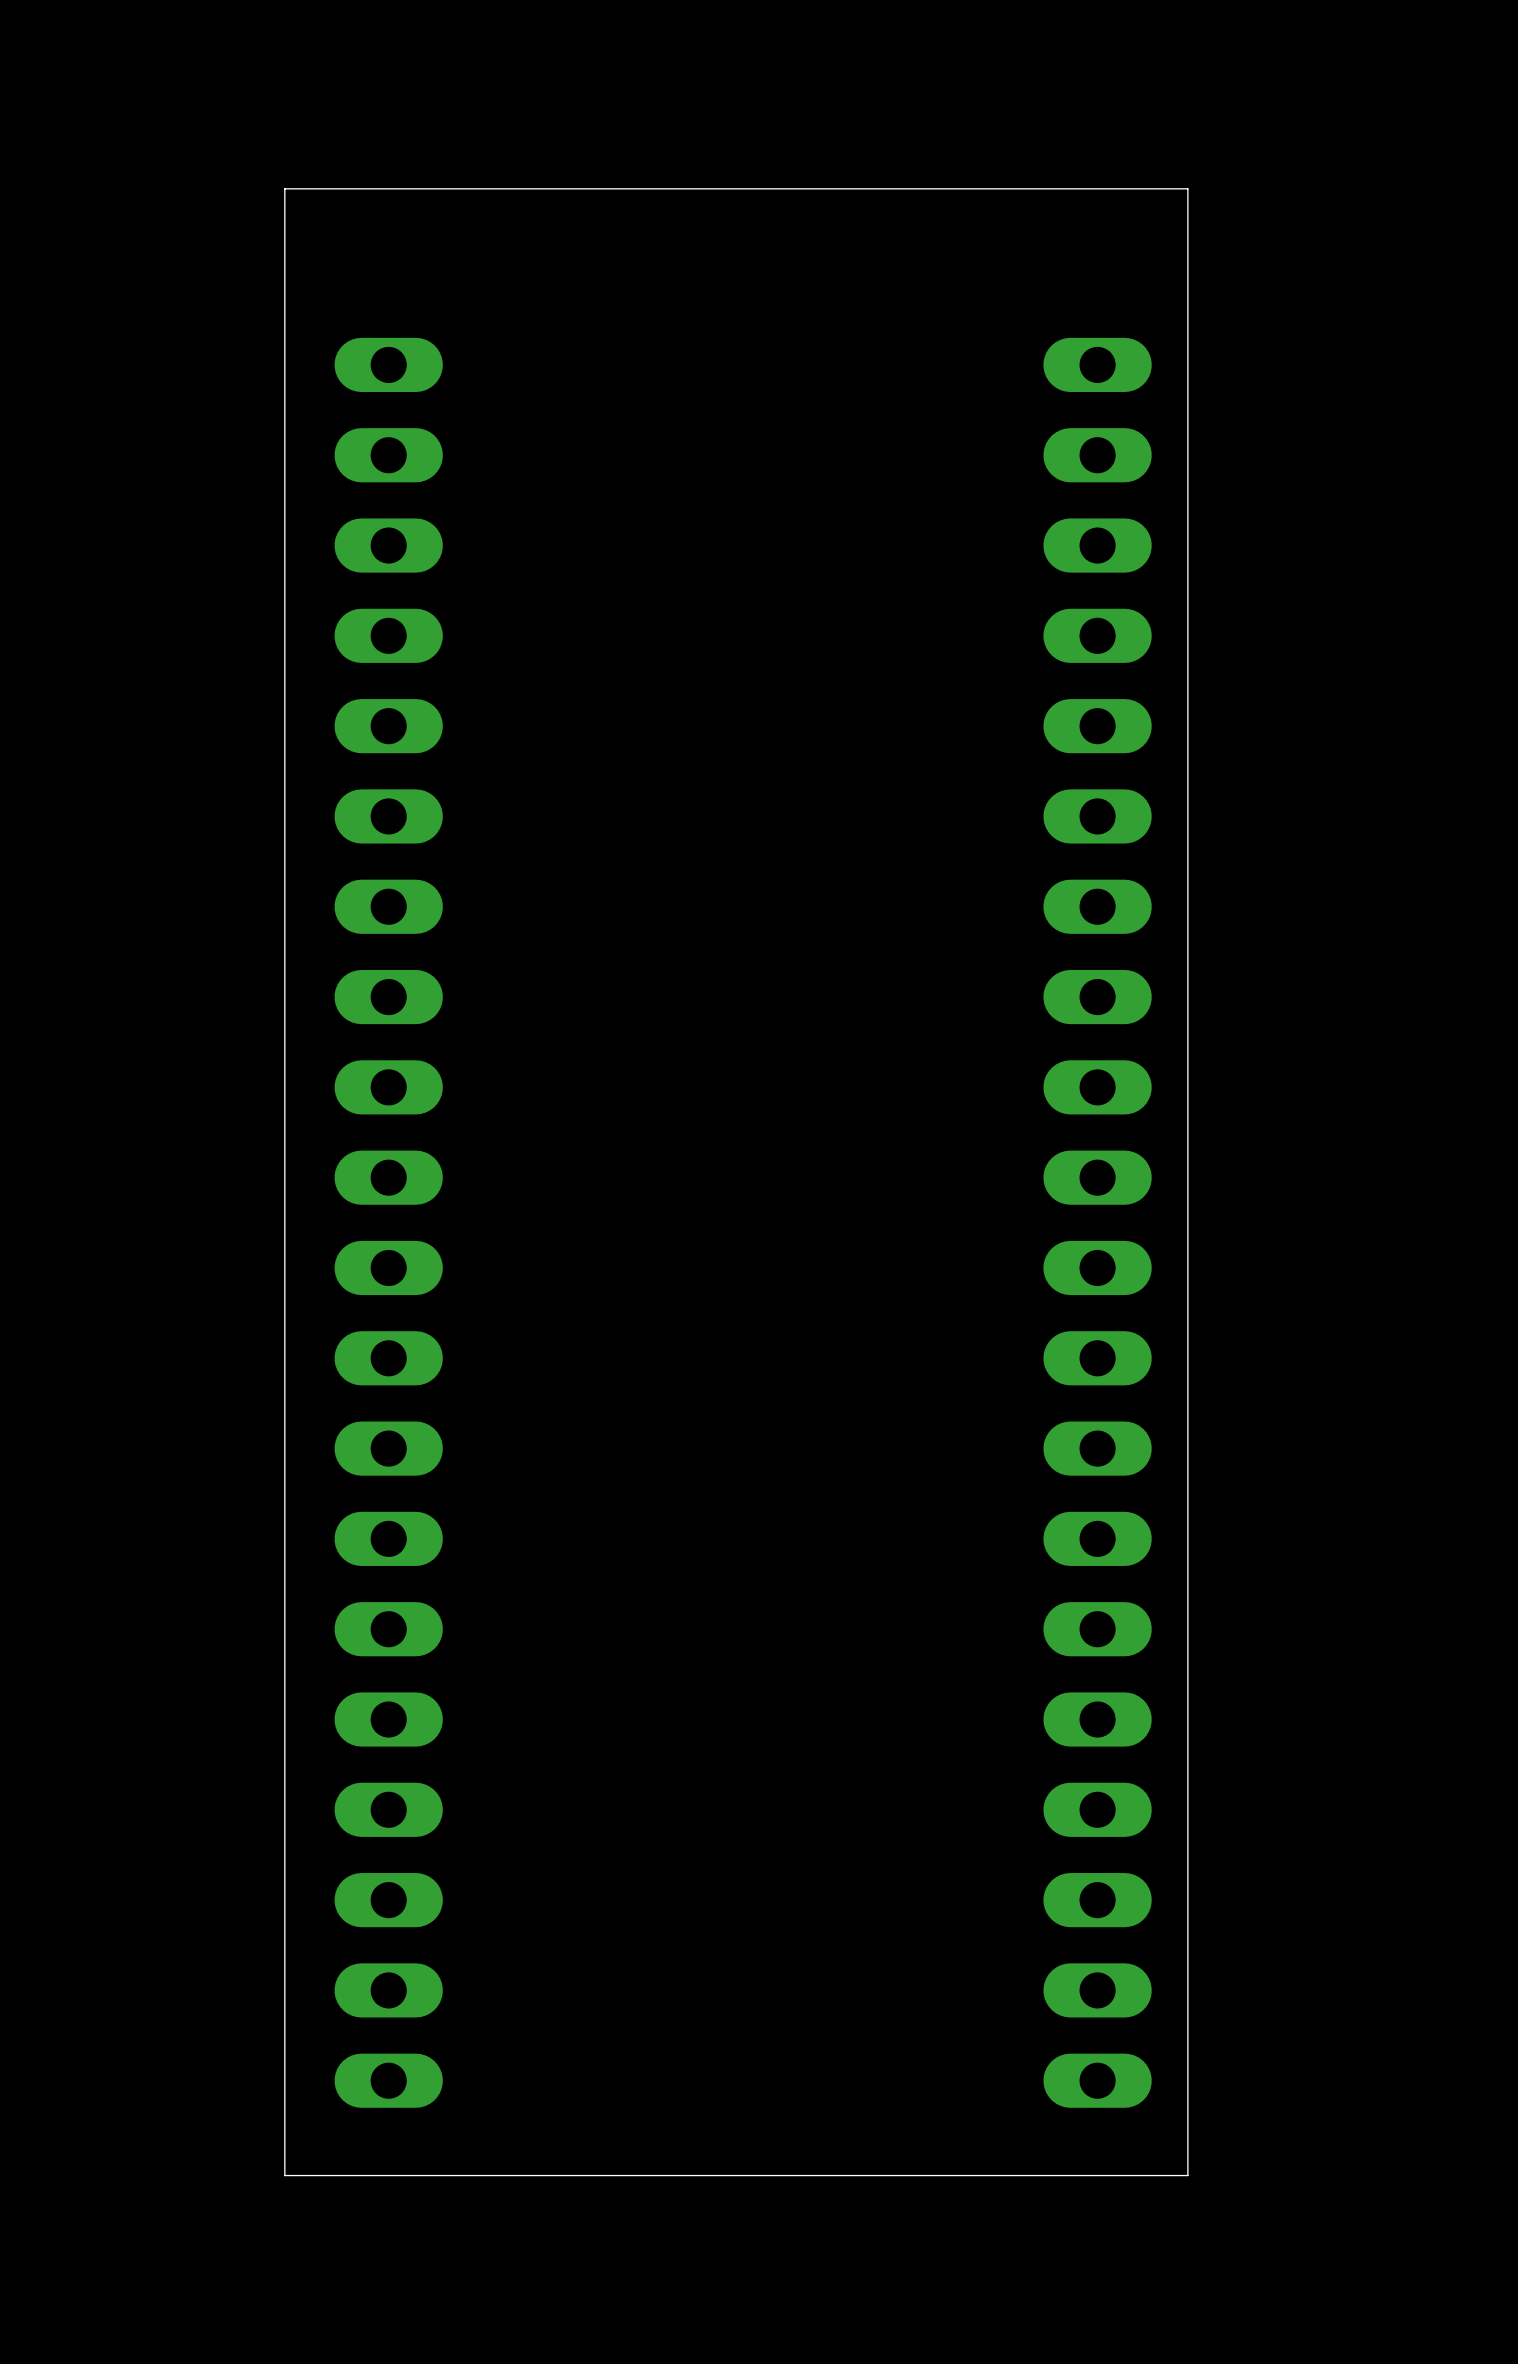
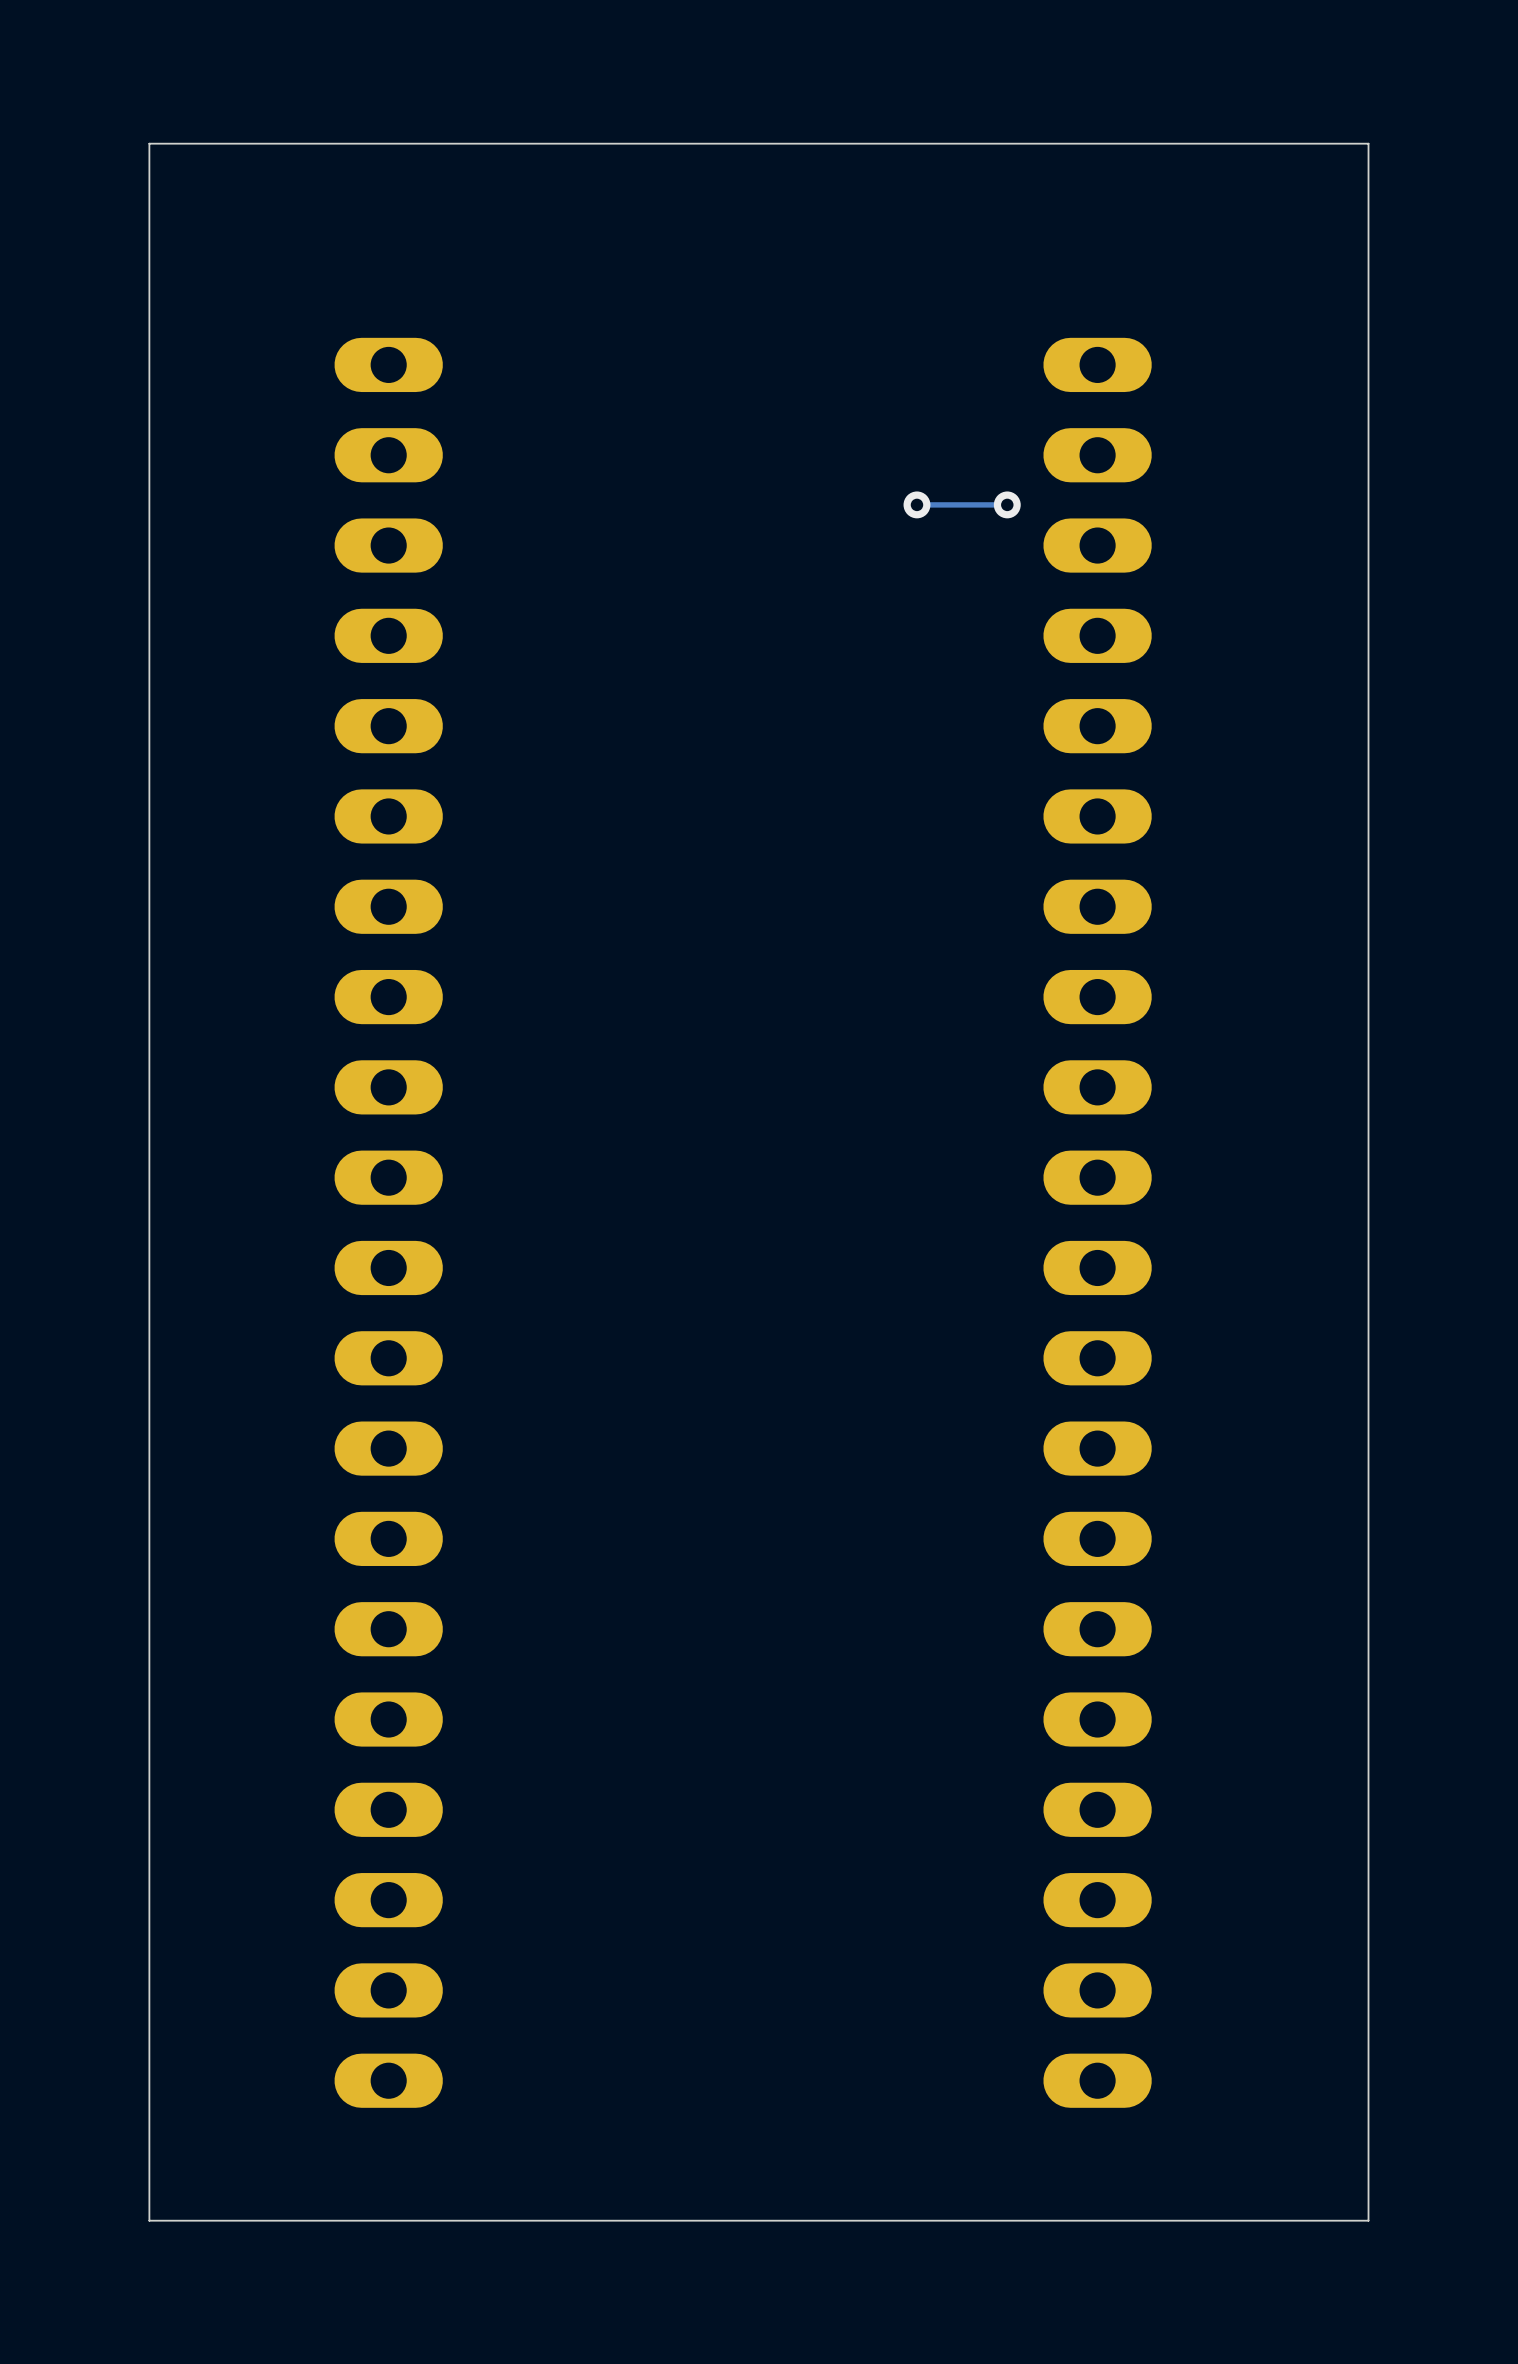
board edge: (1187, 188) (284, 188) (284, 2175) (1187, 2175) (1187, 188) -> (1368, 143) (1368, 2220) (149, 2220) (149, 143) (1368, 143)
via: none -> (916, 504)
track: none -> (1007, 504) (916, 504)
via: none -> (1007, 504)

